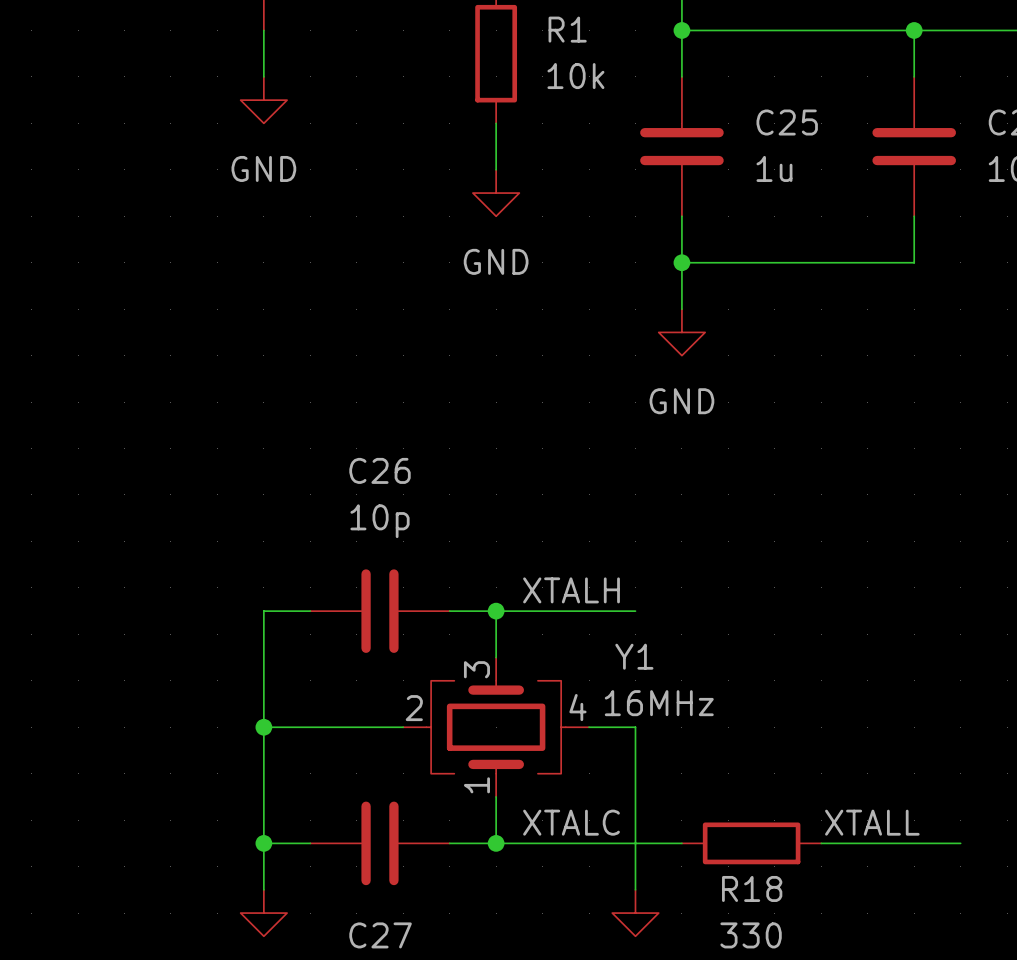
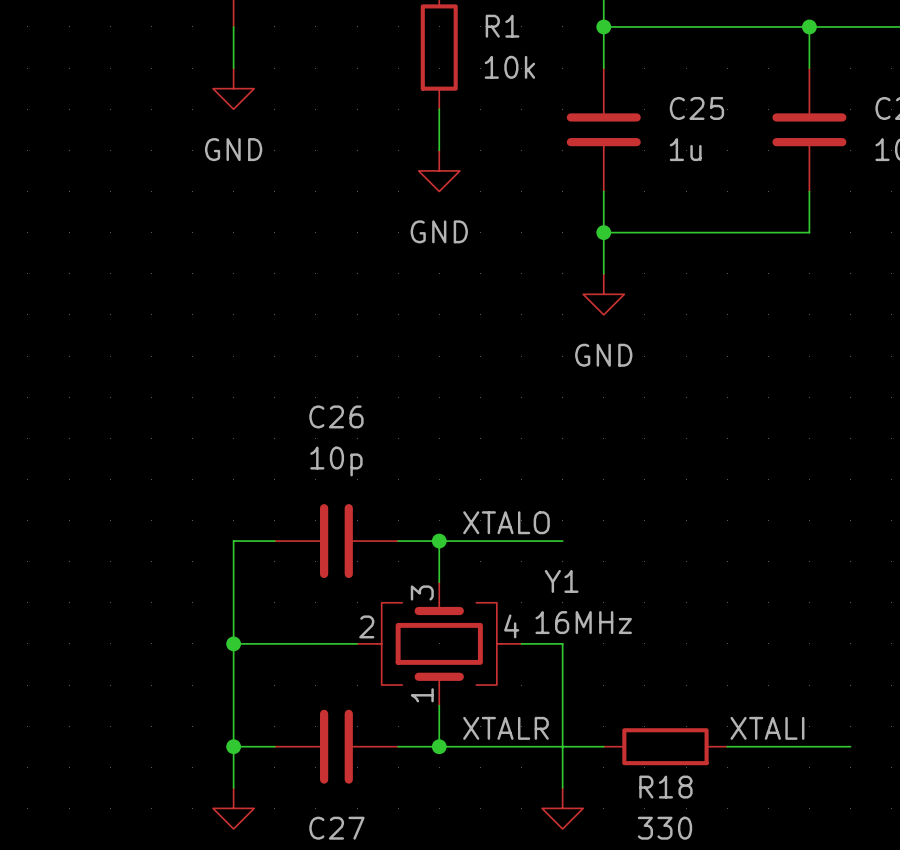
label: XTALH (571, 590) -> XTALO (506, 522)
label: XTALC (571, 822) -> XTALR (506, 728)
label: XTALL (872, 822) -> XTALI (767, 728)

